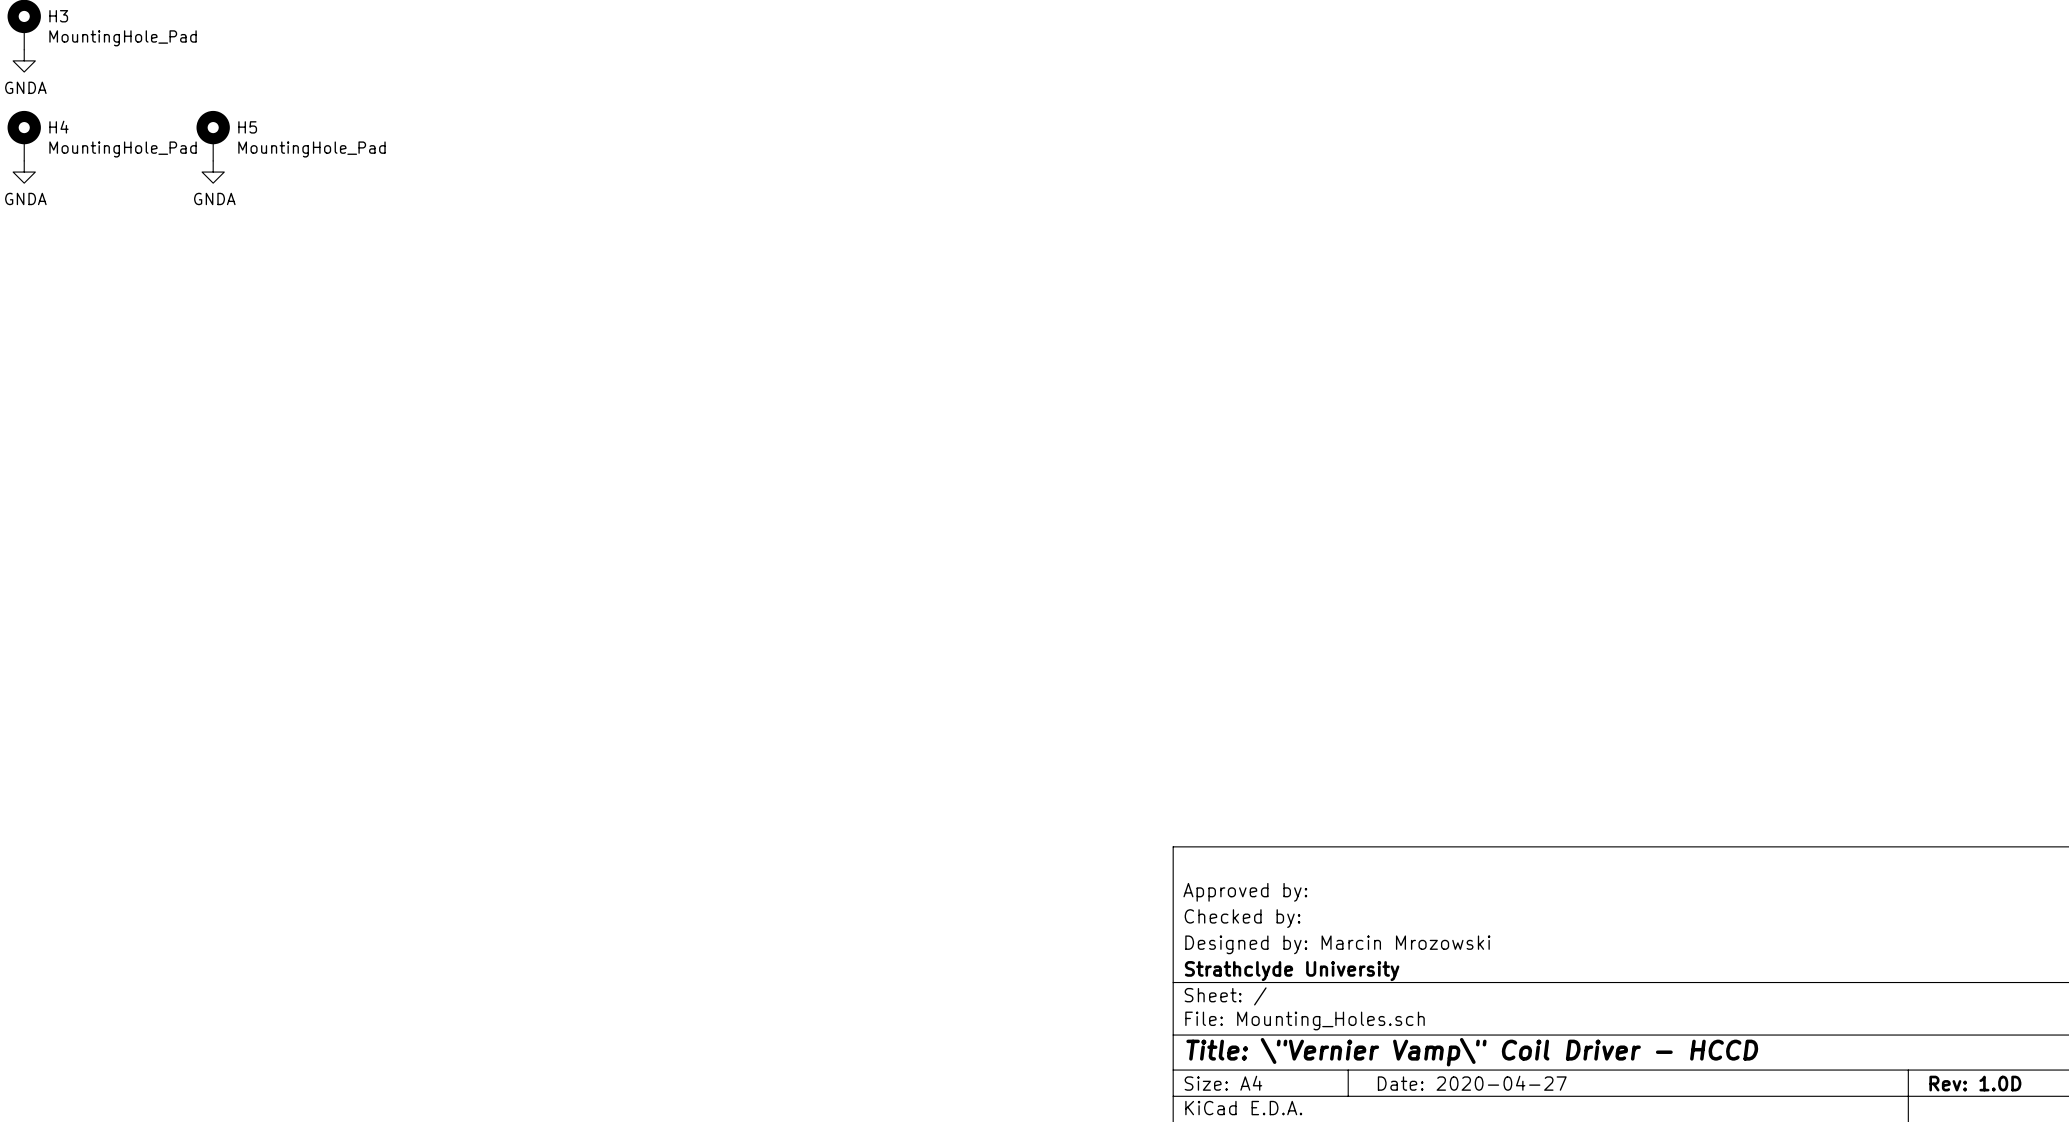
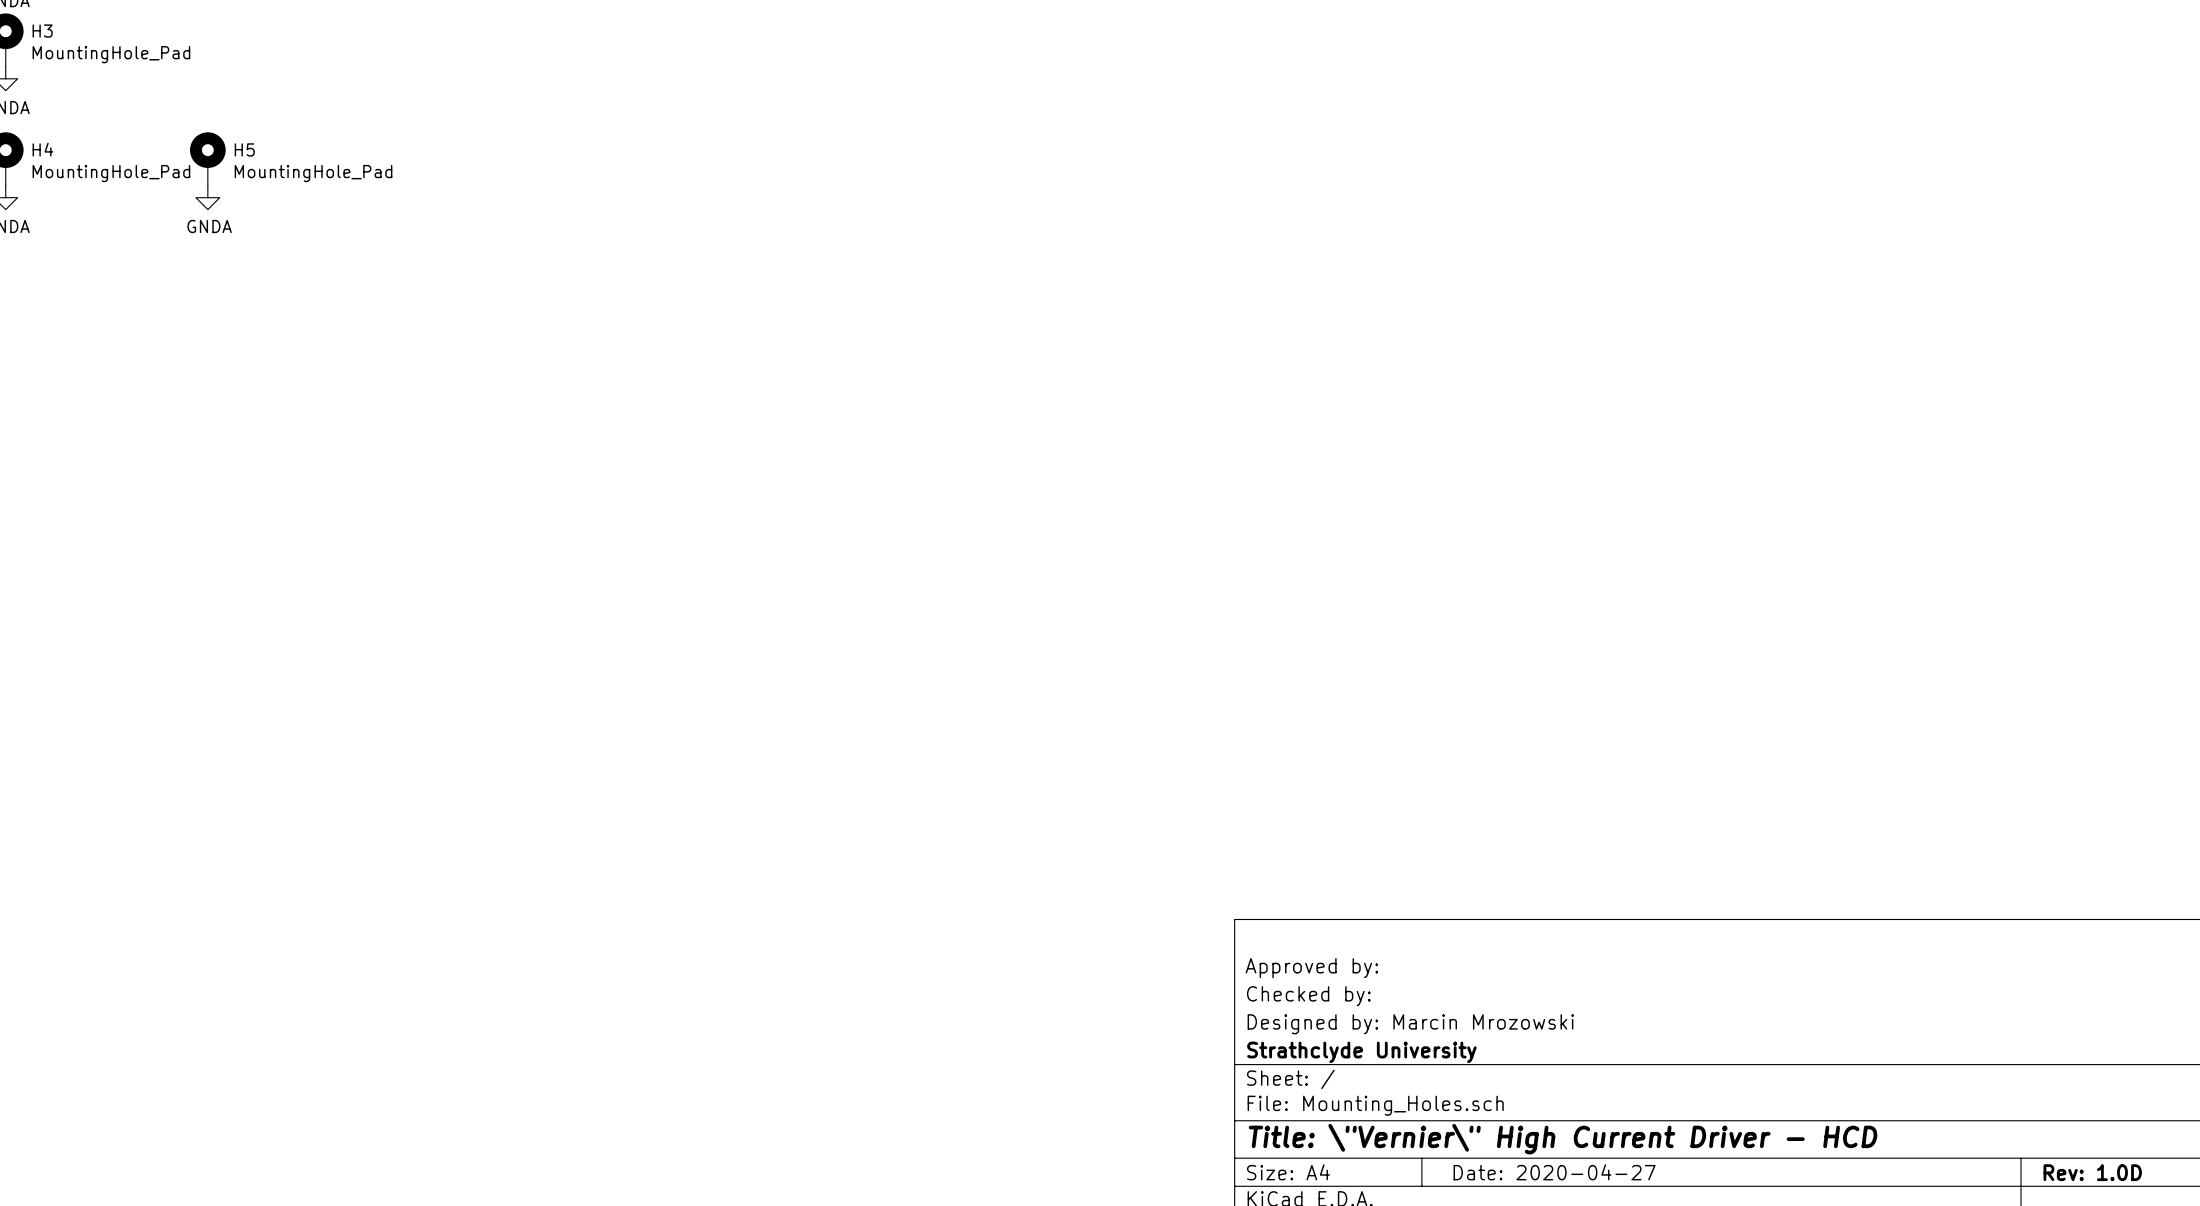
title block: Title: \"Vernier Vamp\" Coil Driver - HCCD (1472, 1052) -> Title: \"Vernier\" High Current Driver - HCD (1563, 1139)

